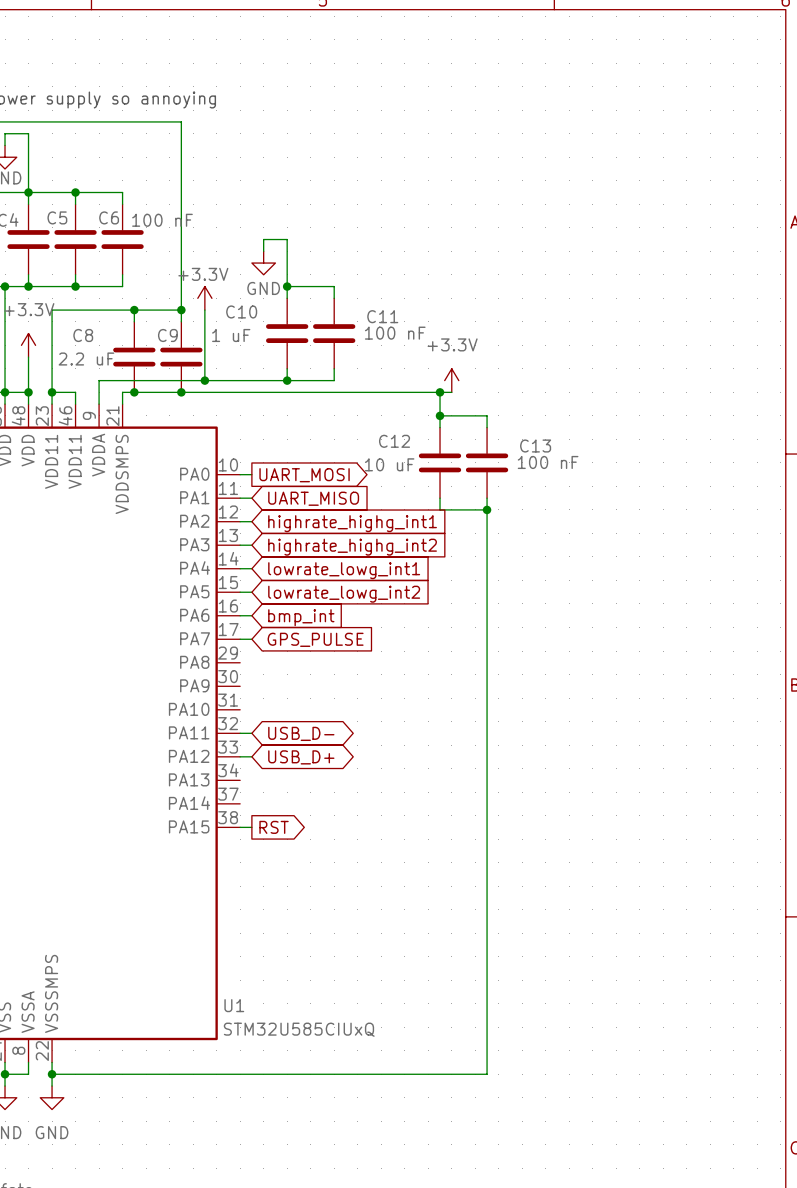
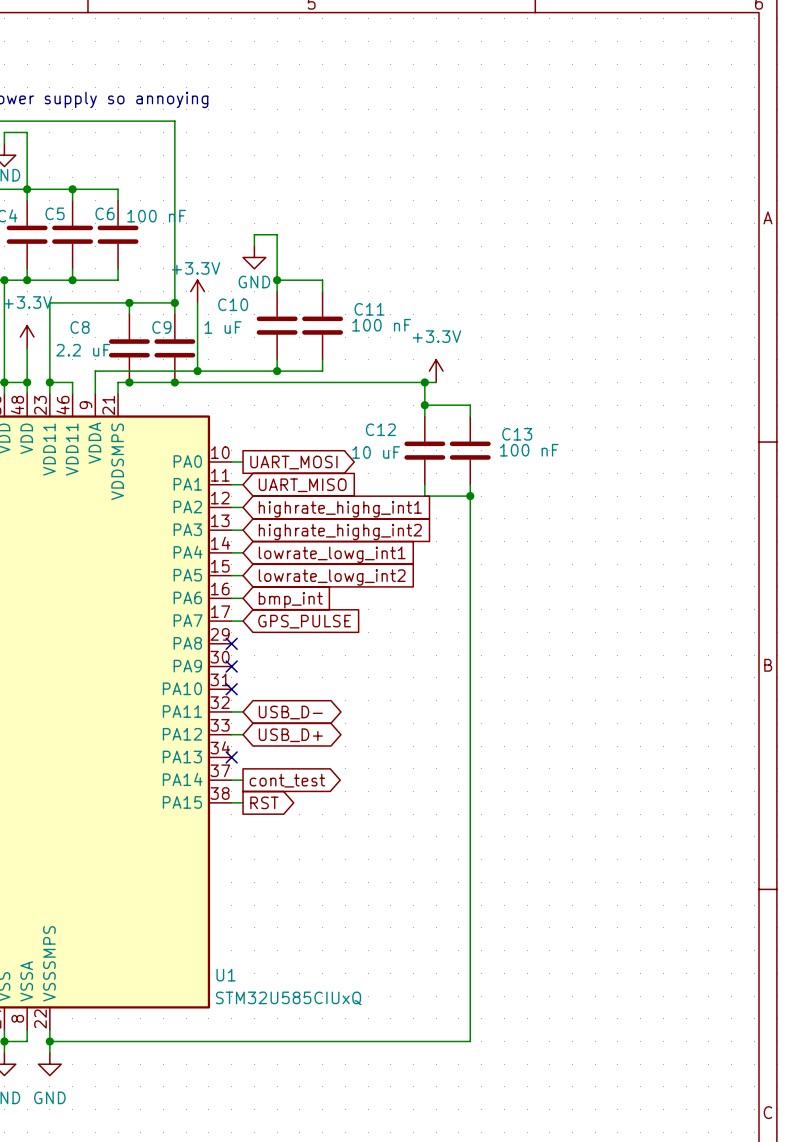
no-connect mark: none -> (231, 643)
no-connect mark: none -> (231, 666)
no-connect mark: none -> (231, 689)
no-connect mark: none -> (231, 757)
wire: none -> (231, 780) (243, 780)
global label: none -> cont_test (287, 780)

